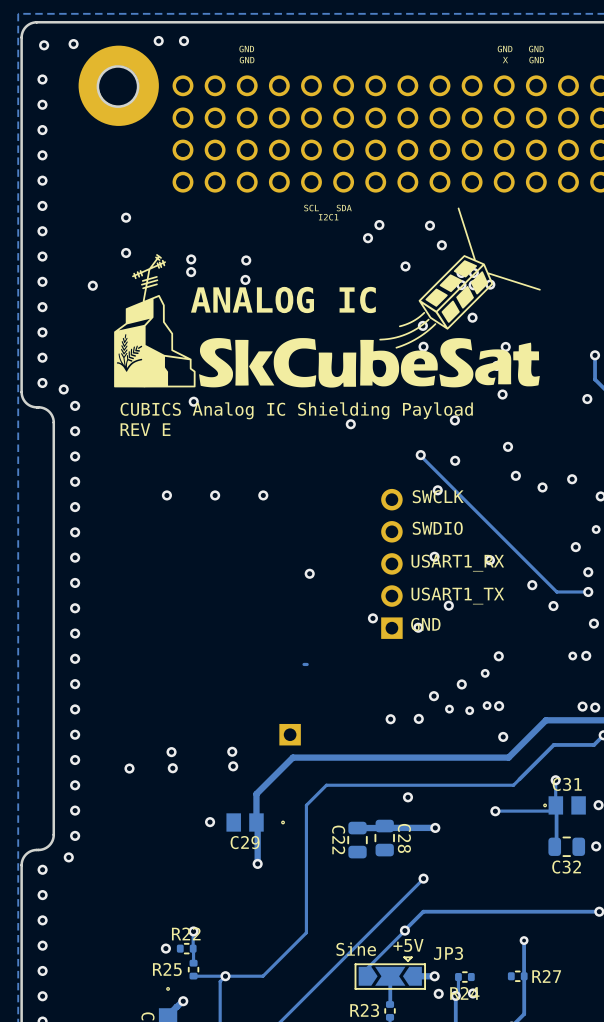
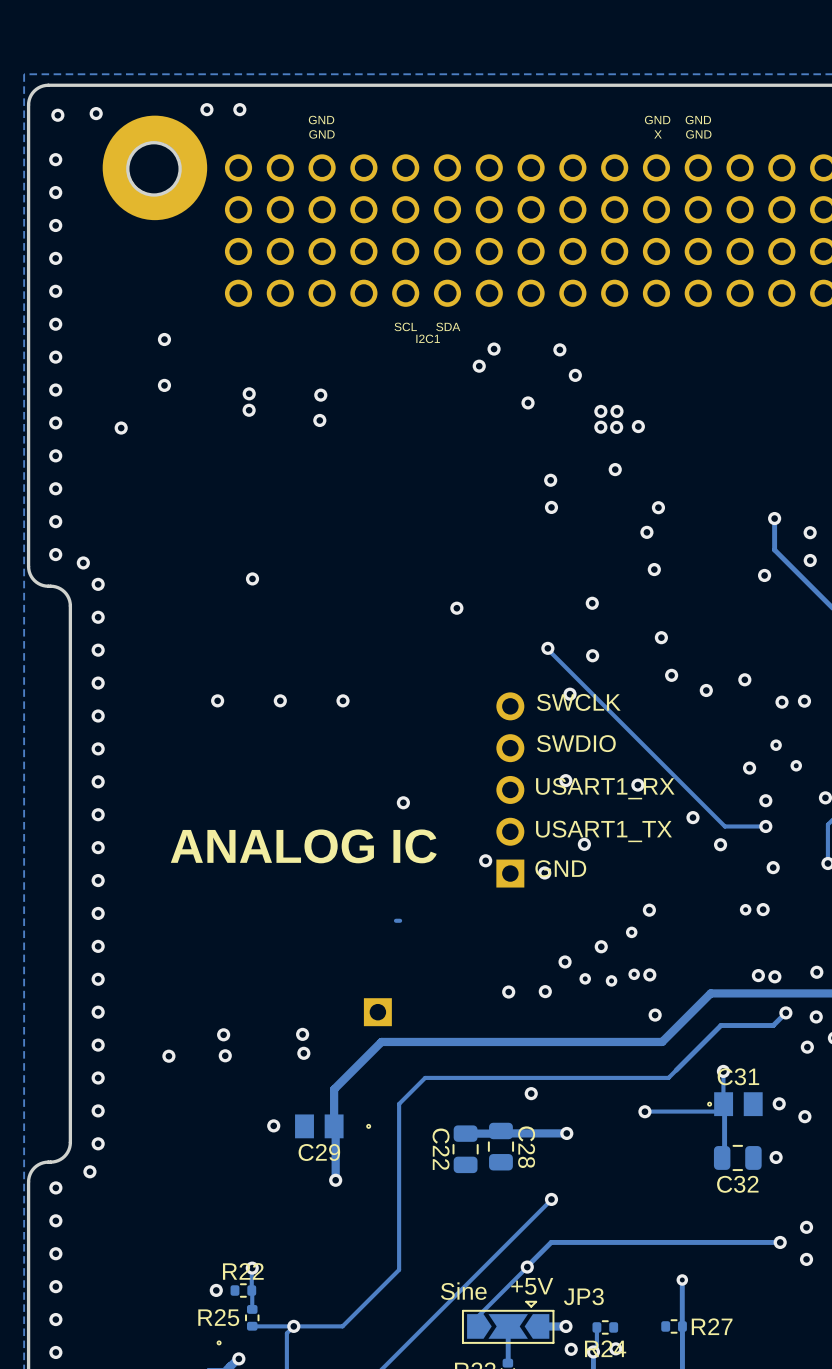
drawing: [114, 207, 541, 388] -> none
text position: ANALOG IC (283, 299) -> ANALOG IC (303, 846)
text: CUBICS Analog IC Shielding Payload (296, 410) -> none
text: REV E (145, 429) -> none

